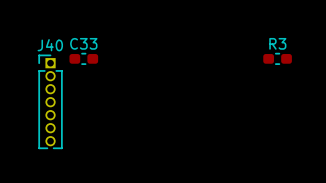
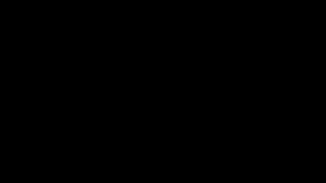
C33: (83, 58) -> none
R3: (277, 58) -> none
J40: (50, 101) -> none

